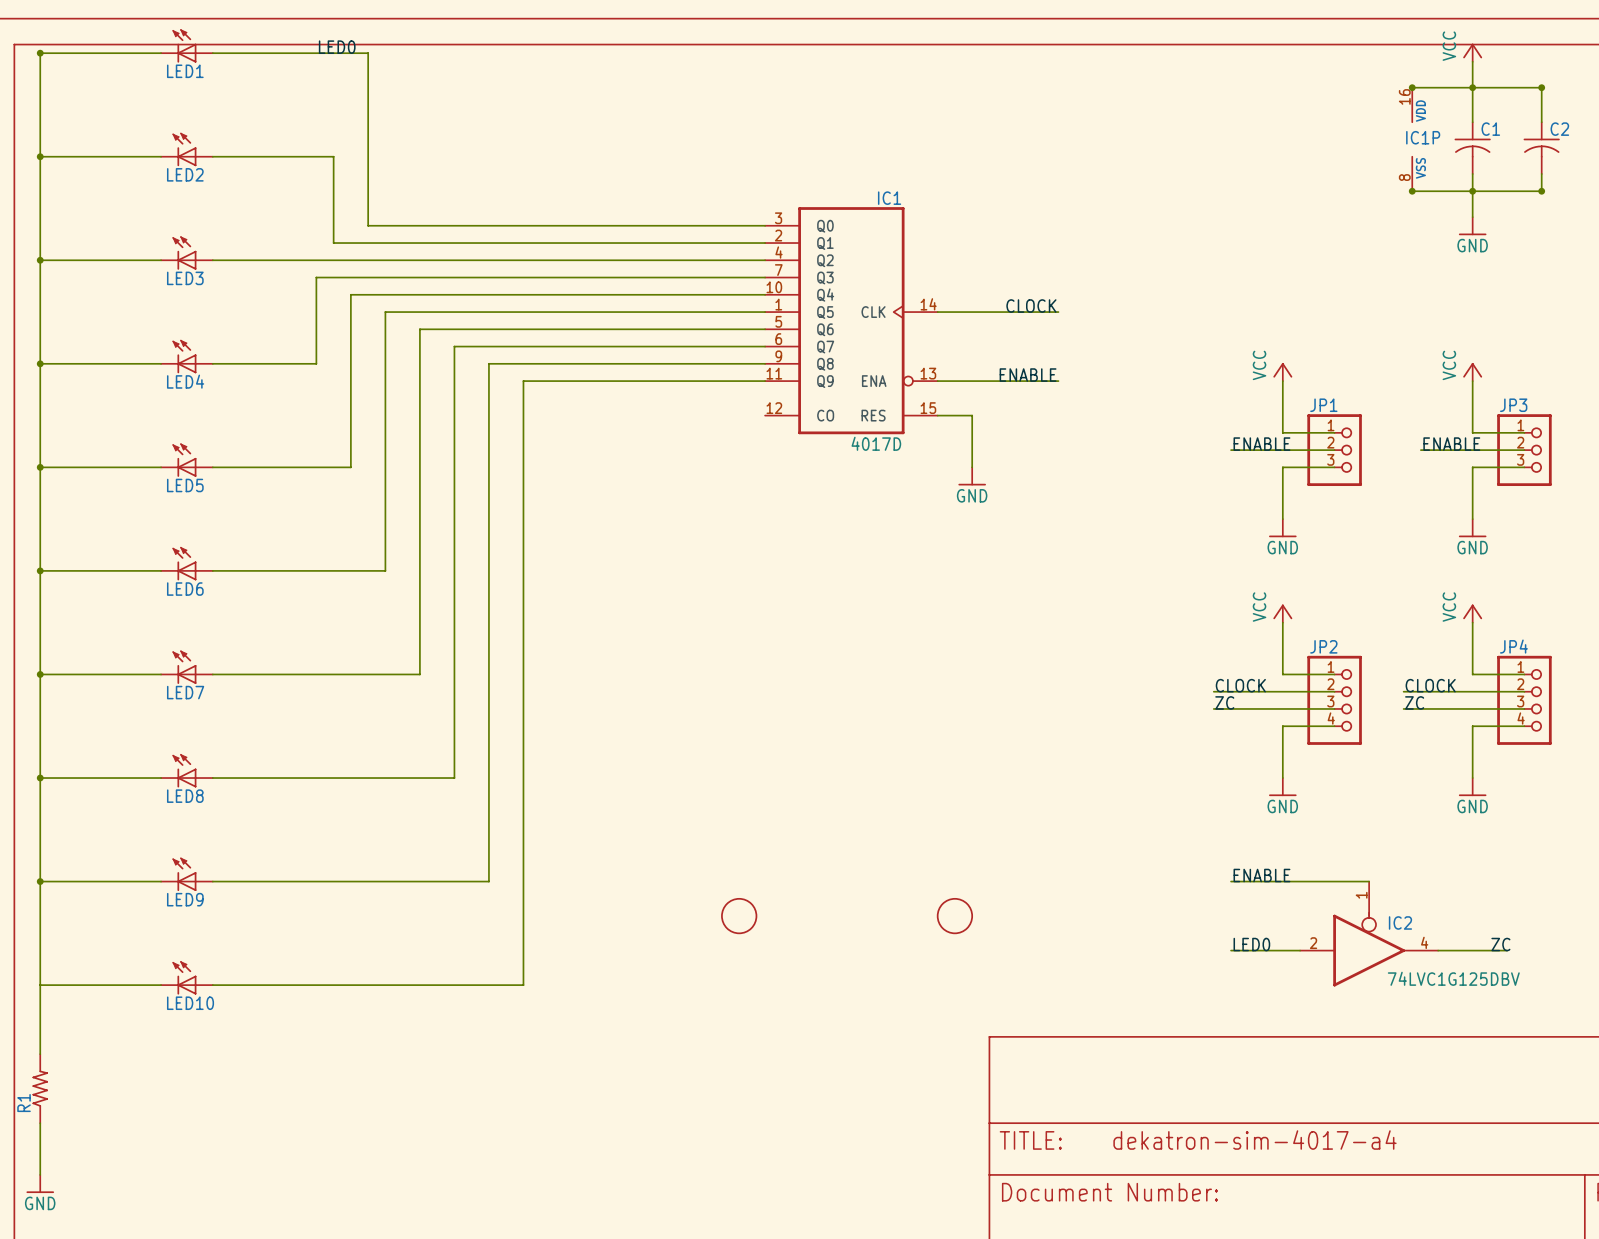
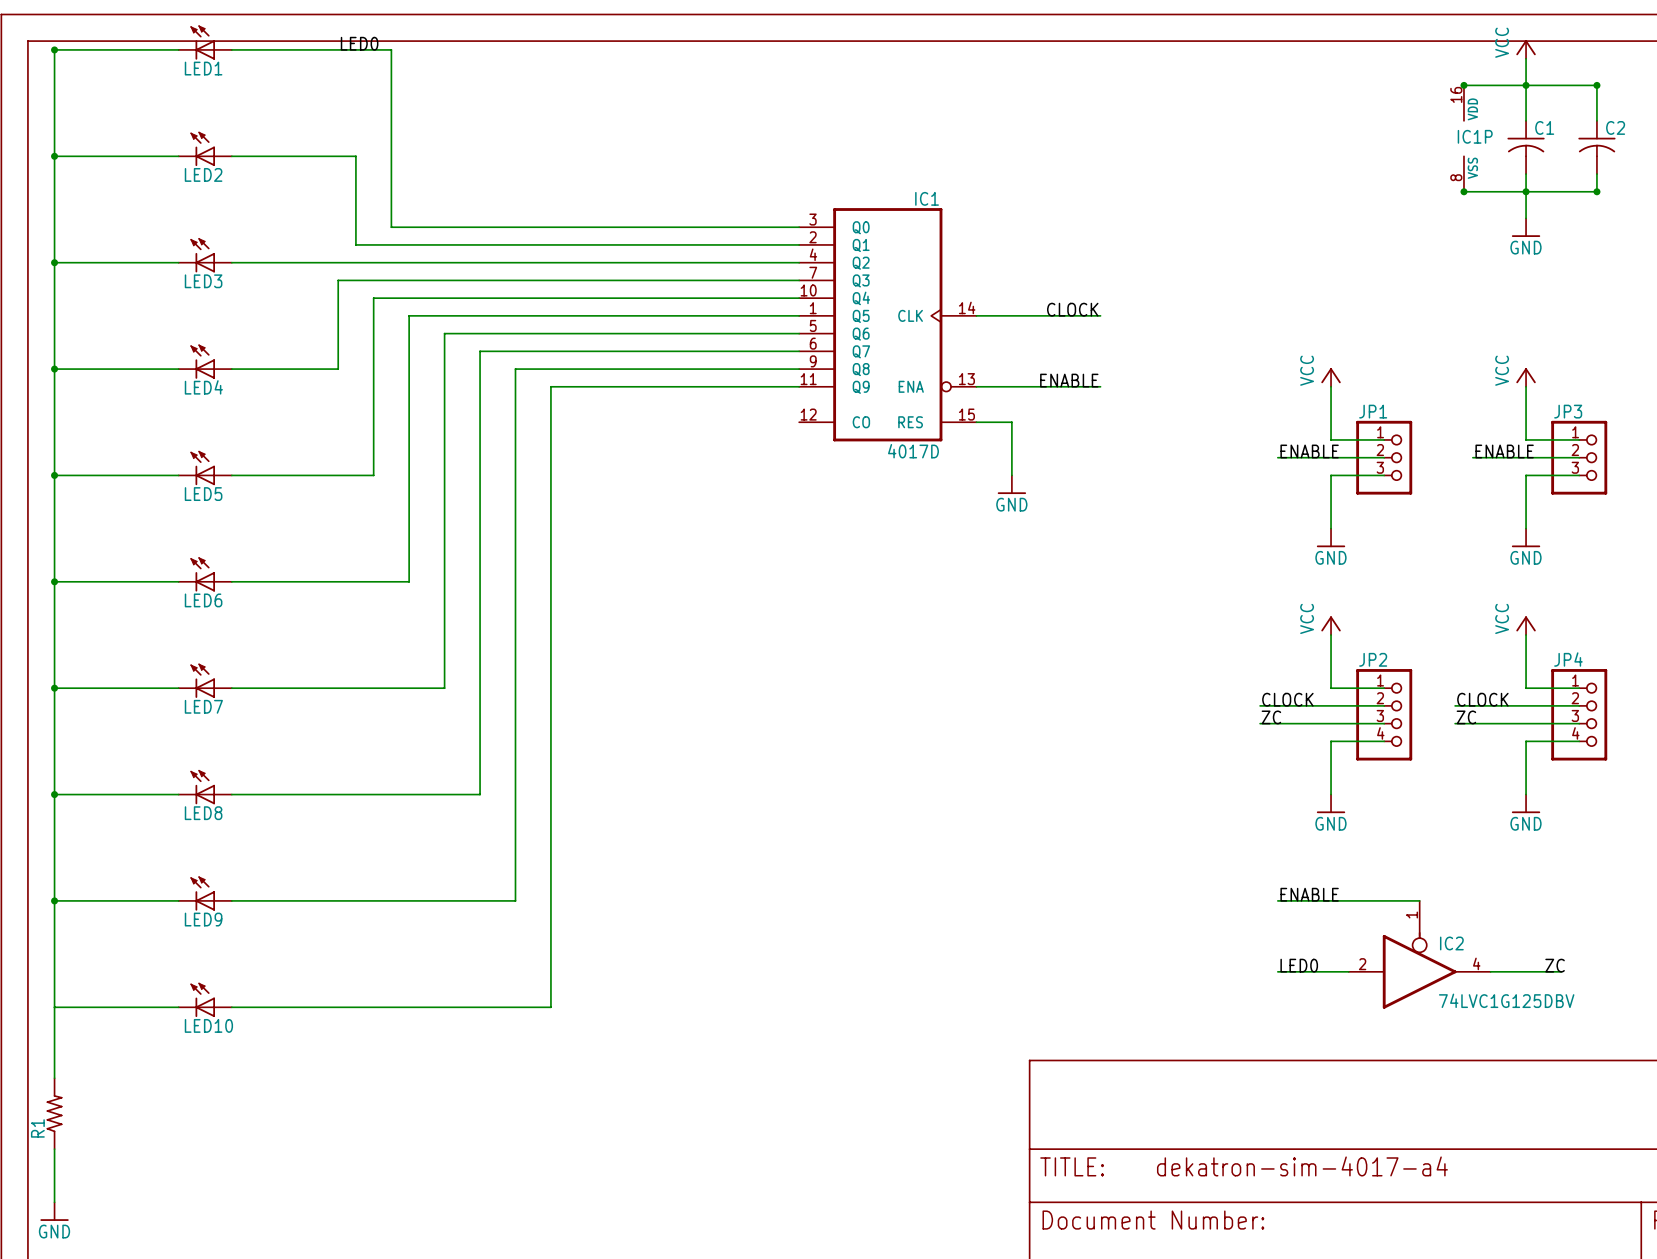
part: (739, 916) -> none
part: (954, 916) -> none

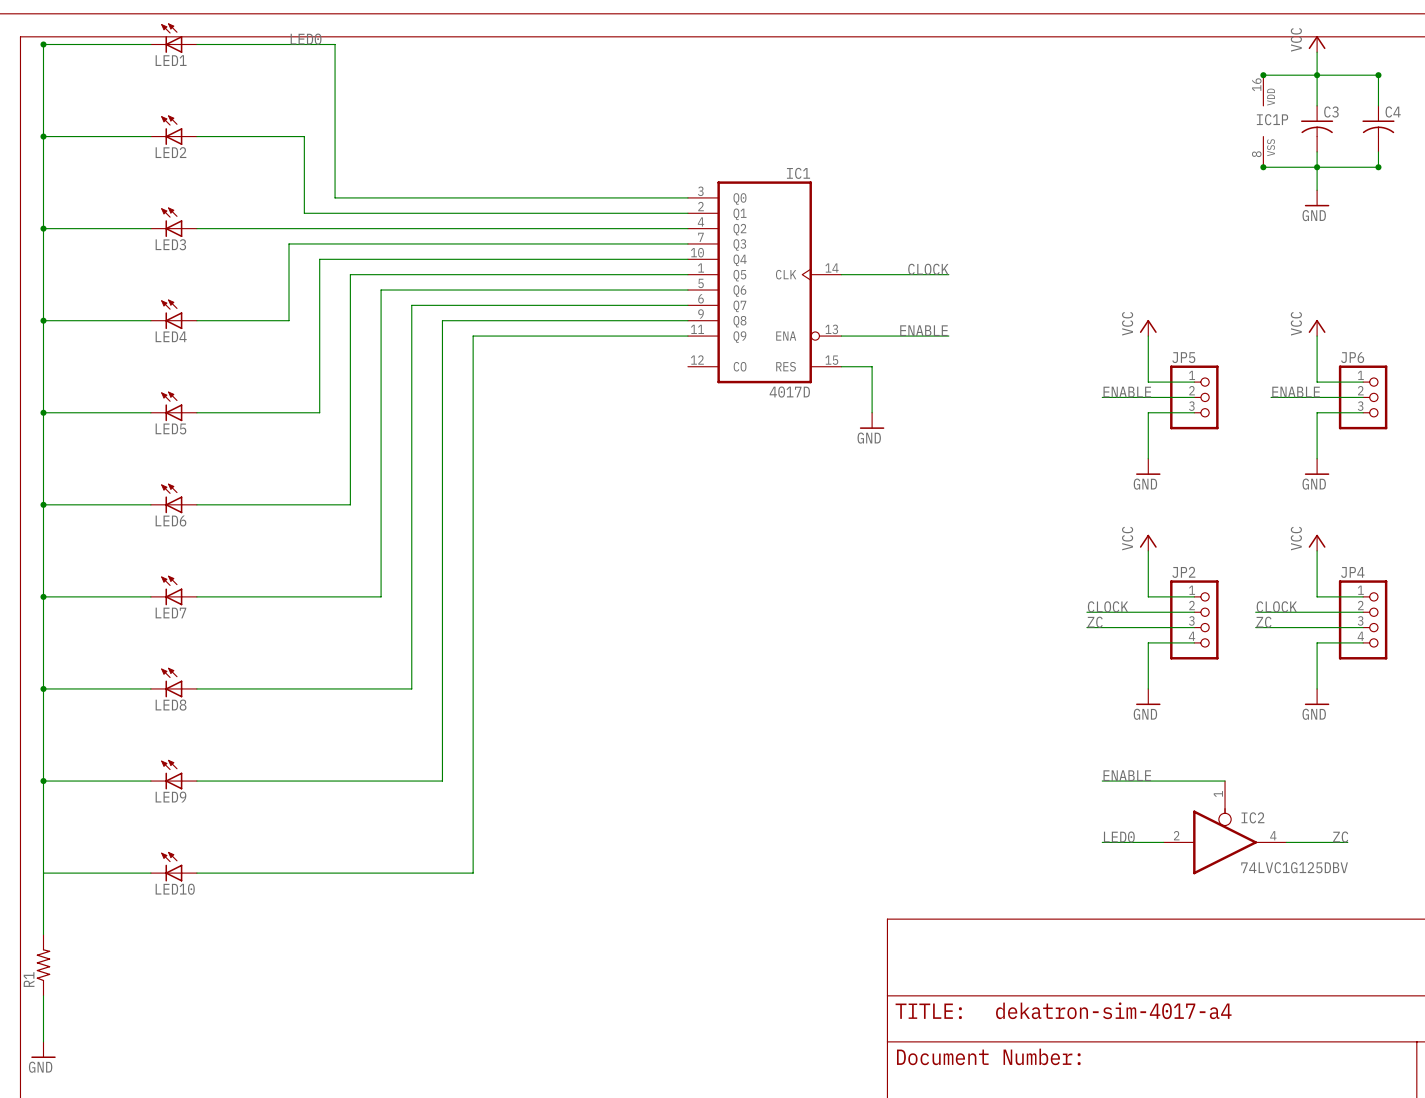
C1 name: C1 (1544, 127) -> C3 (1331, 112)
C2 name: C2 (1615, 127) -> C4 (1393, 112)
JP1 name: JP1 (1373, 411) -> JP5 (1183, 357)
JP3 name: JP3 (1568, 411) -> JP6 (1352, 357)

